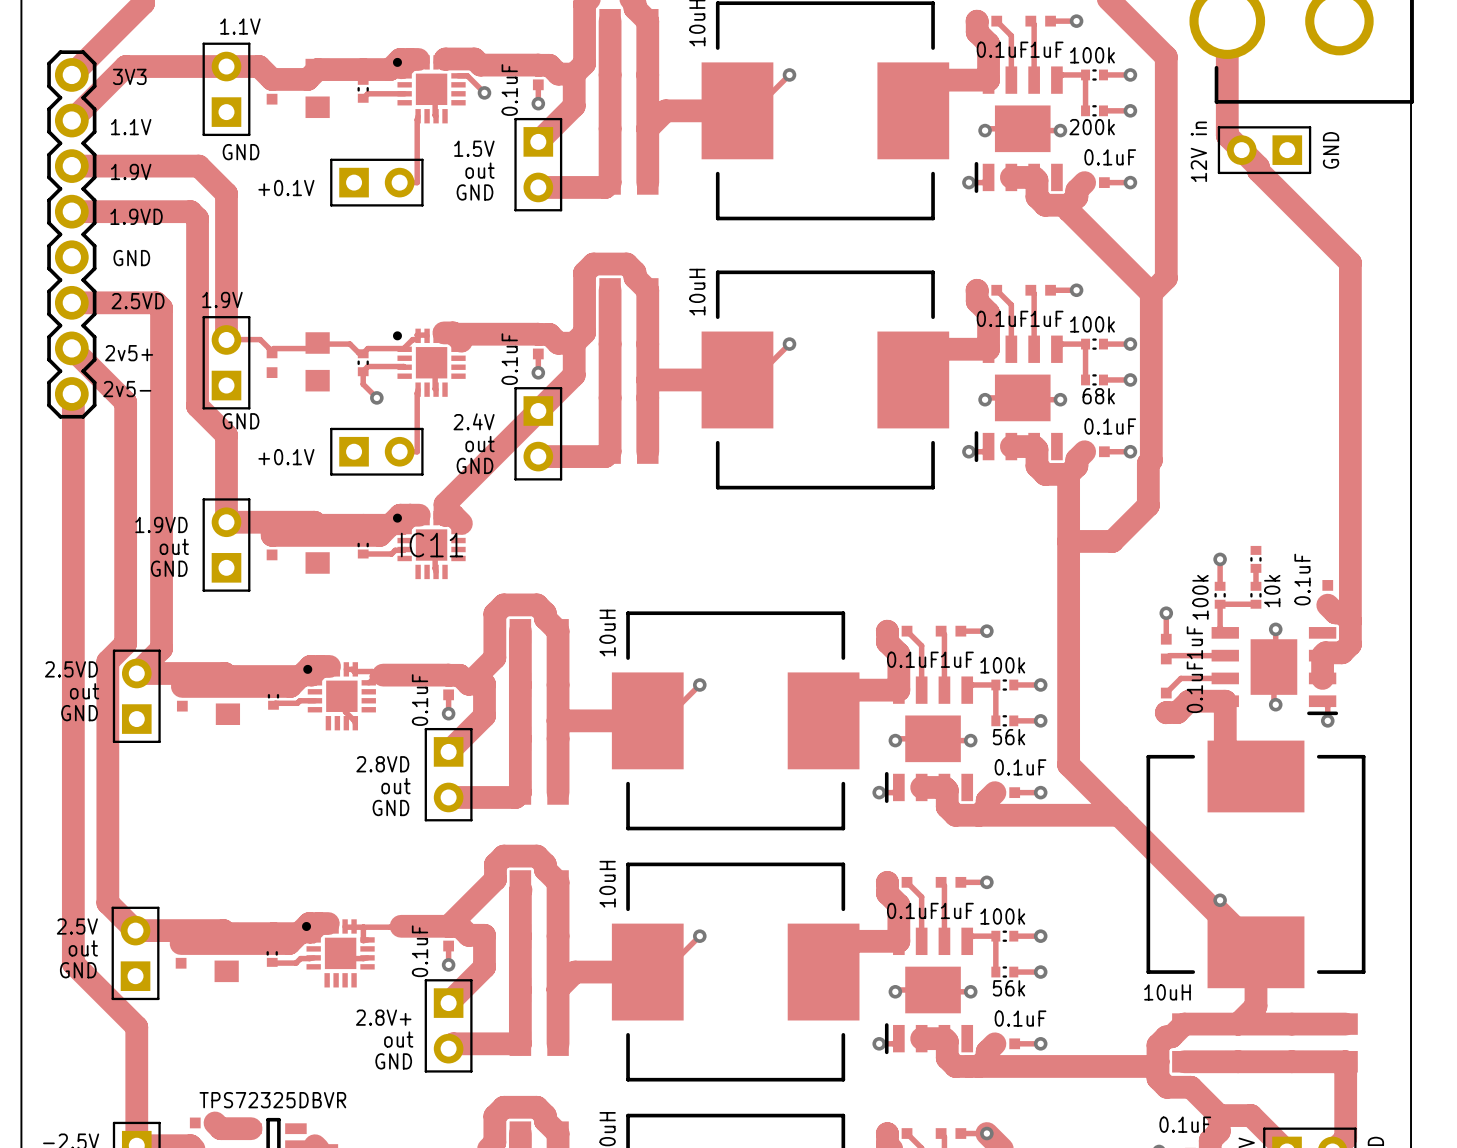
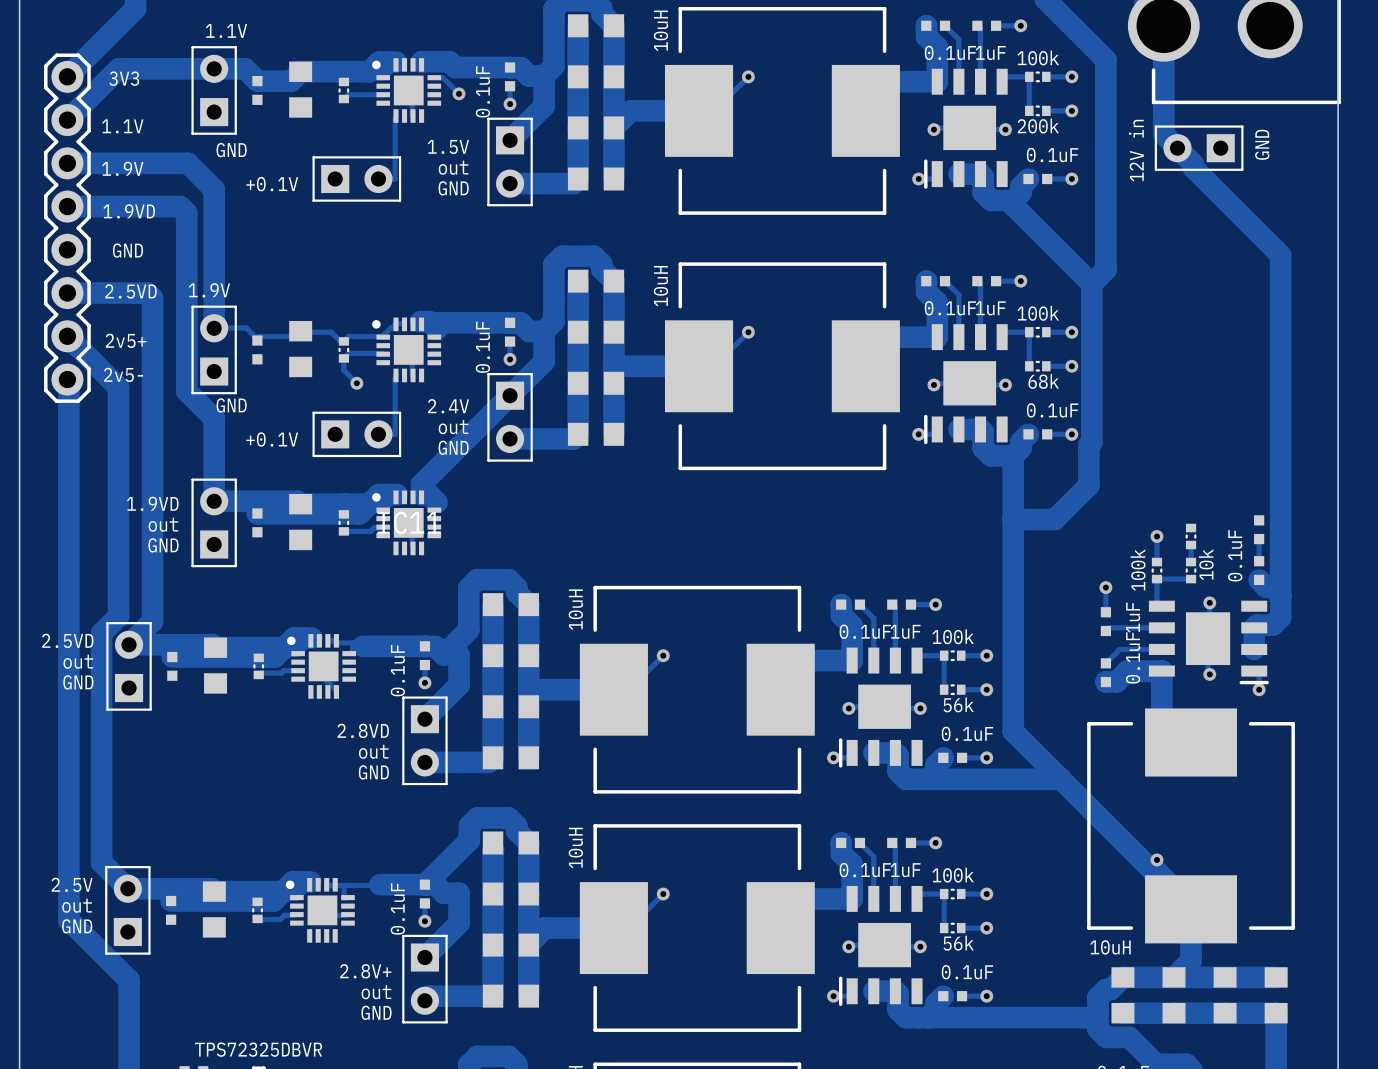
part: none -> (1259, 529)
track: none -> (1259, 539) (1259, 561)

